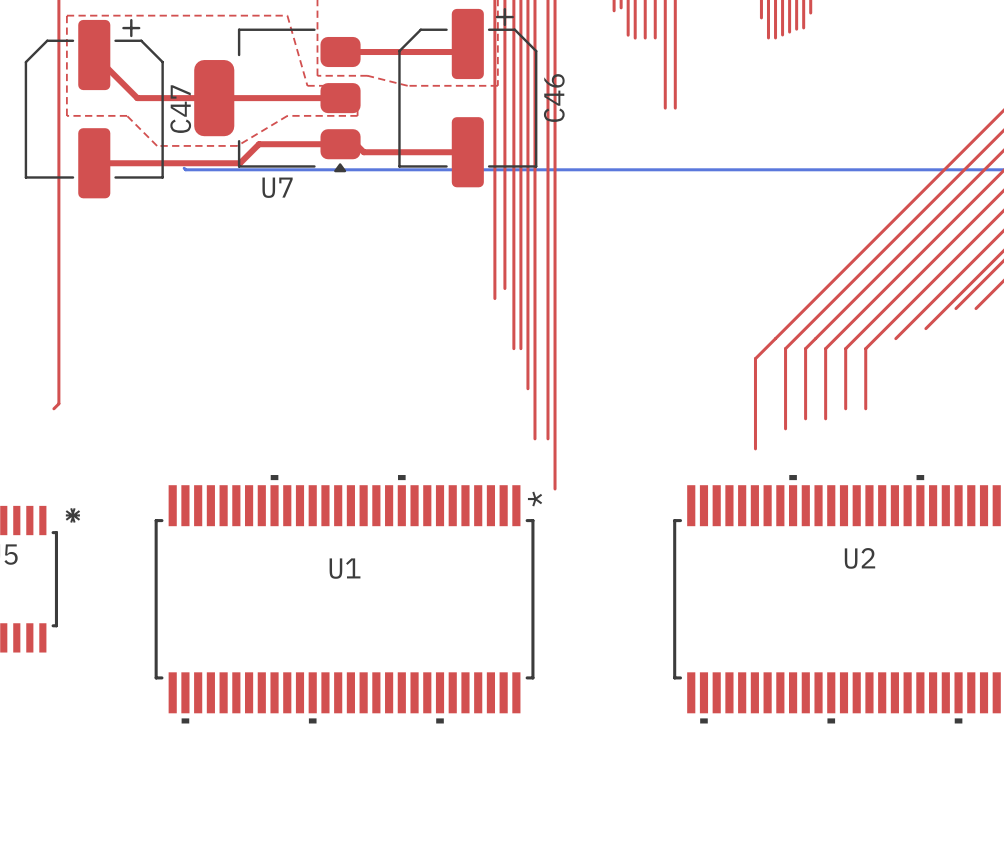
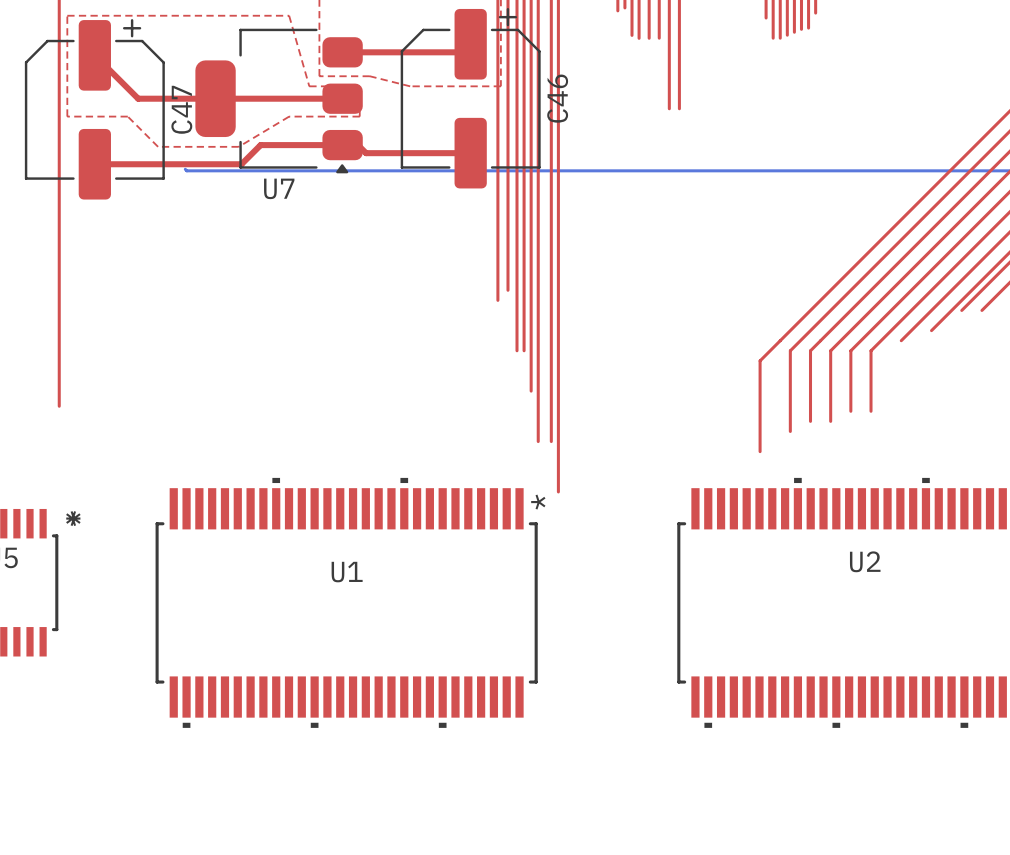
top track: (58, 403) (53, 408) -> none

